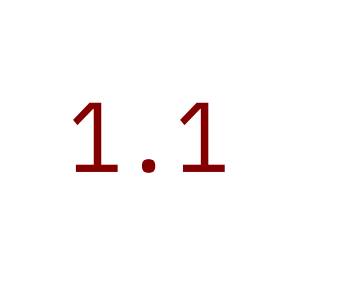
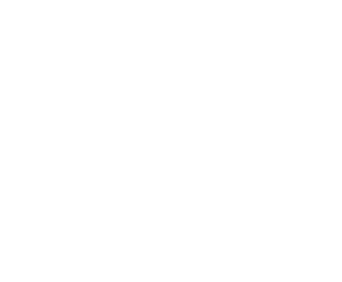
text: 1.1 (148, 137) -> none

